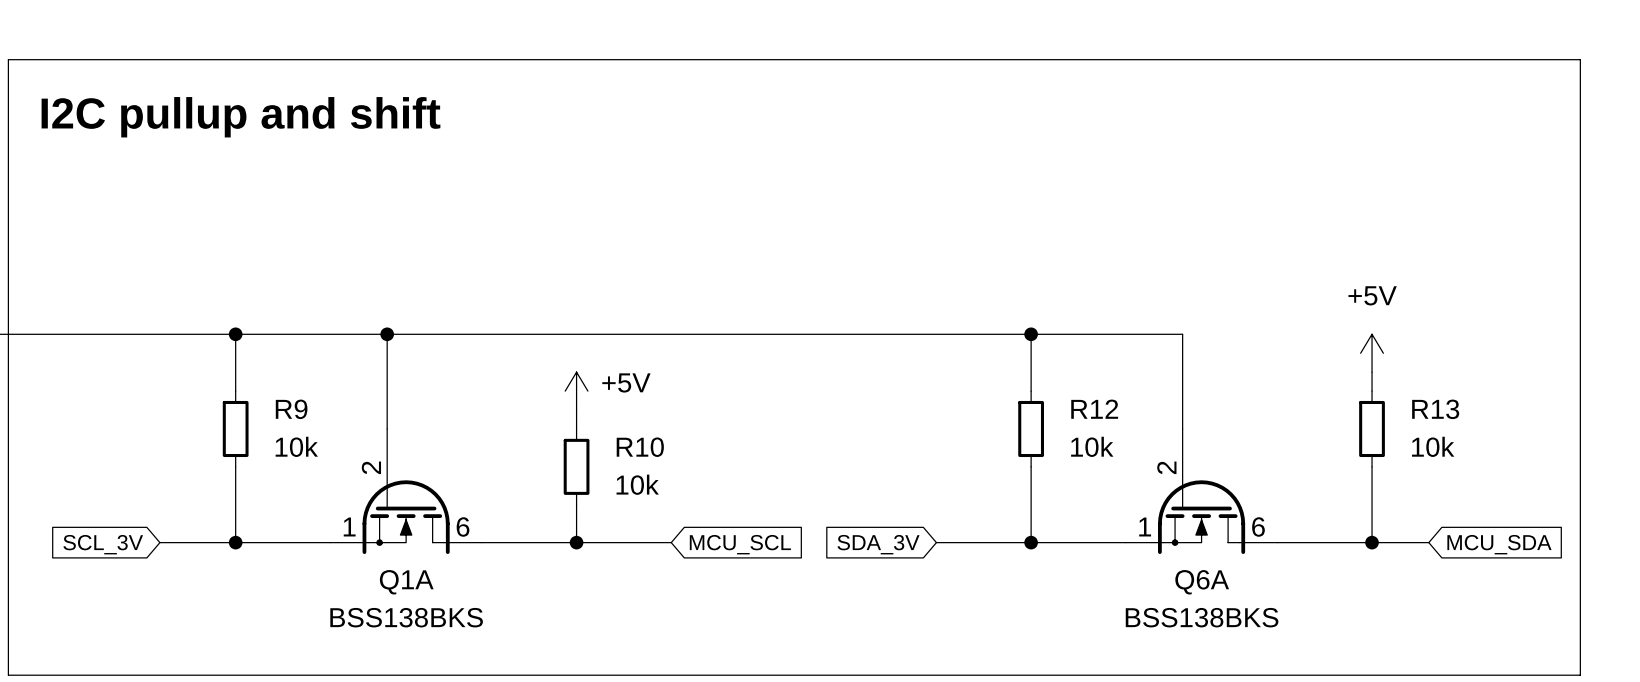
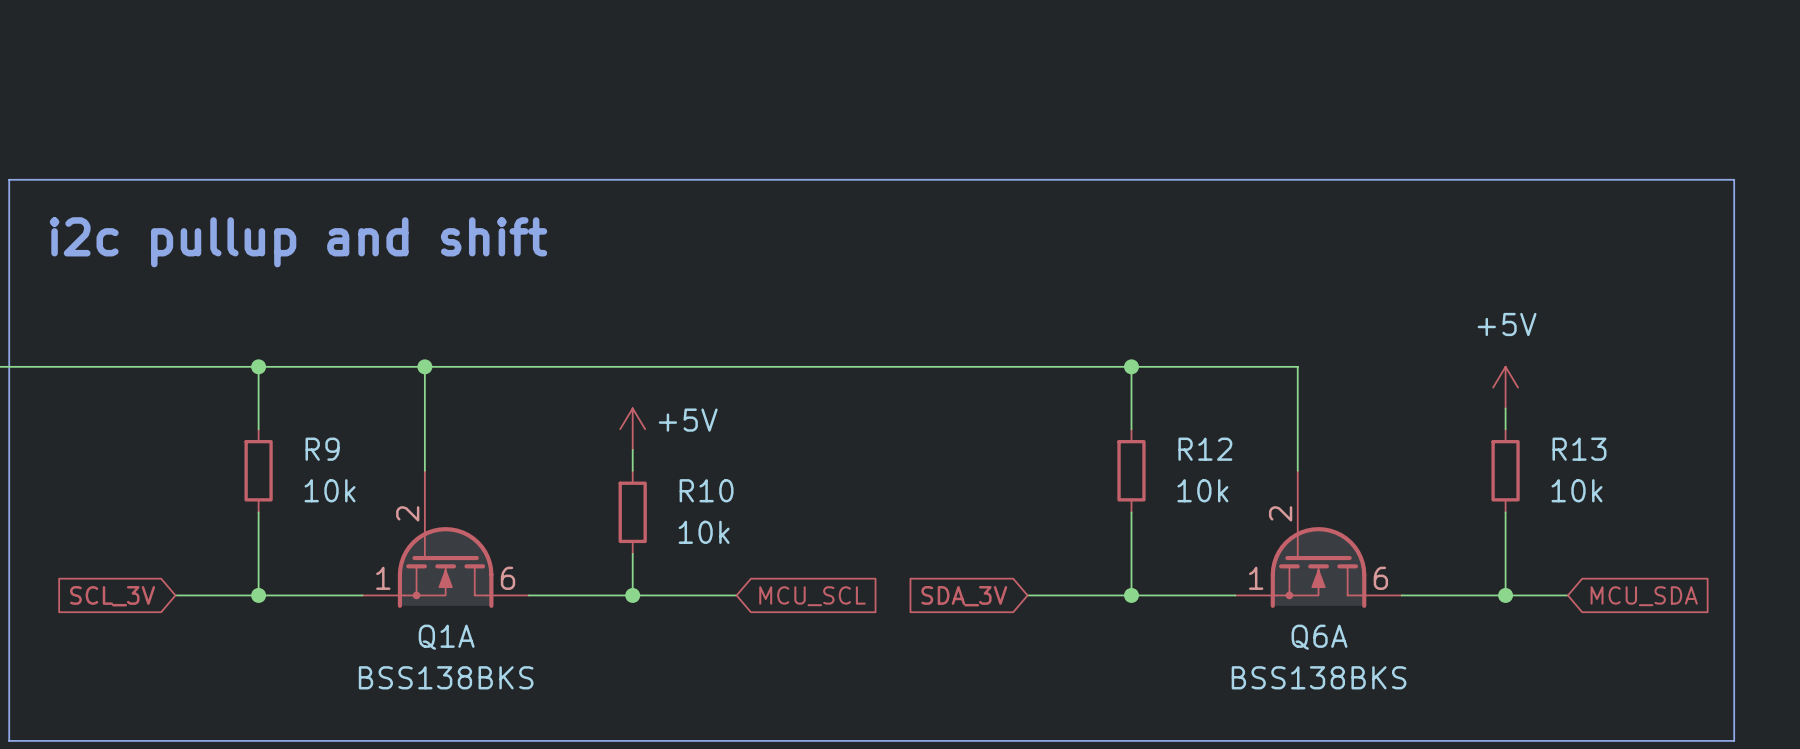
text: I2C pullup and shift (240, 117) -> none
line: (8, 163) (8, 59) (1580, 59) (1580, 163) -> (9, 179) (1734, 179)
text: none -> i2c pullup and shift (298, 242)

